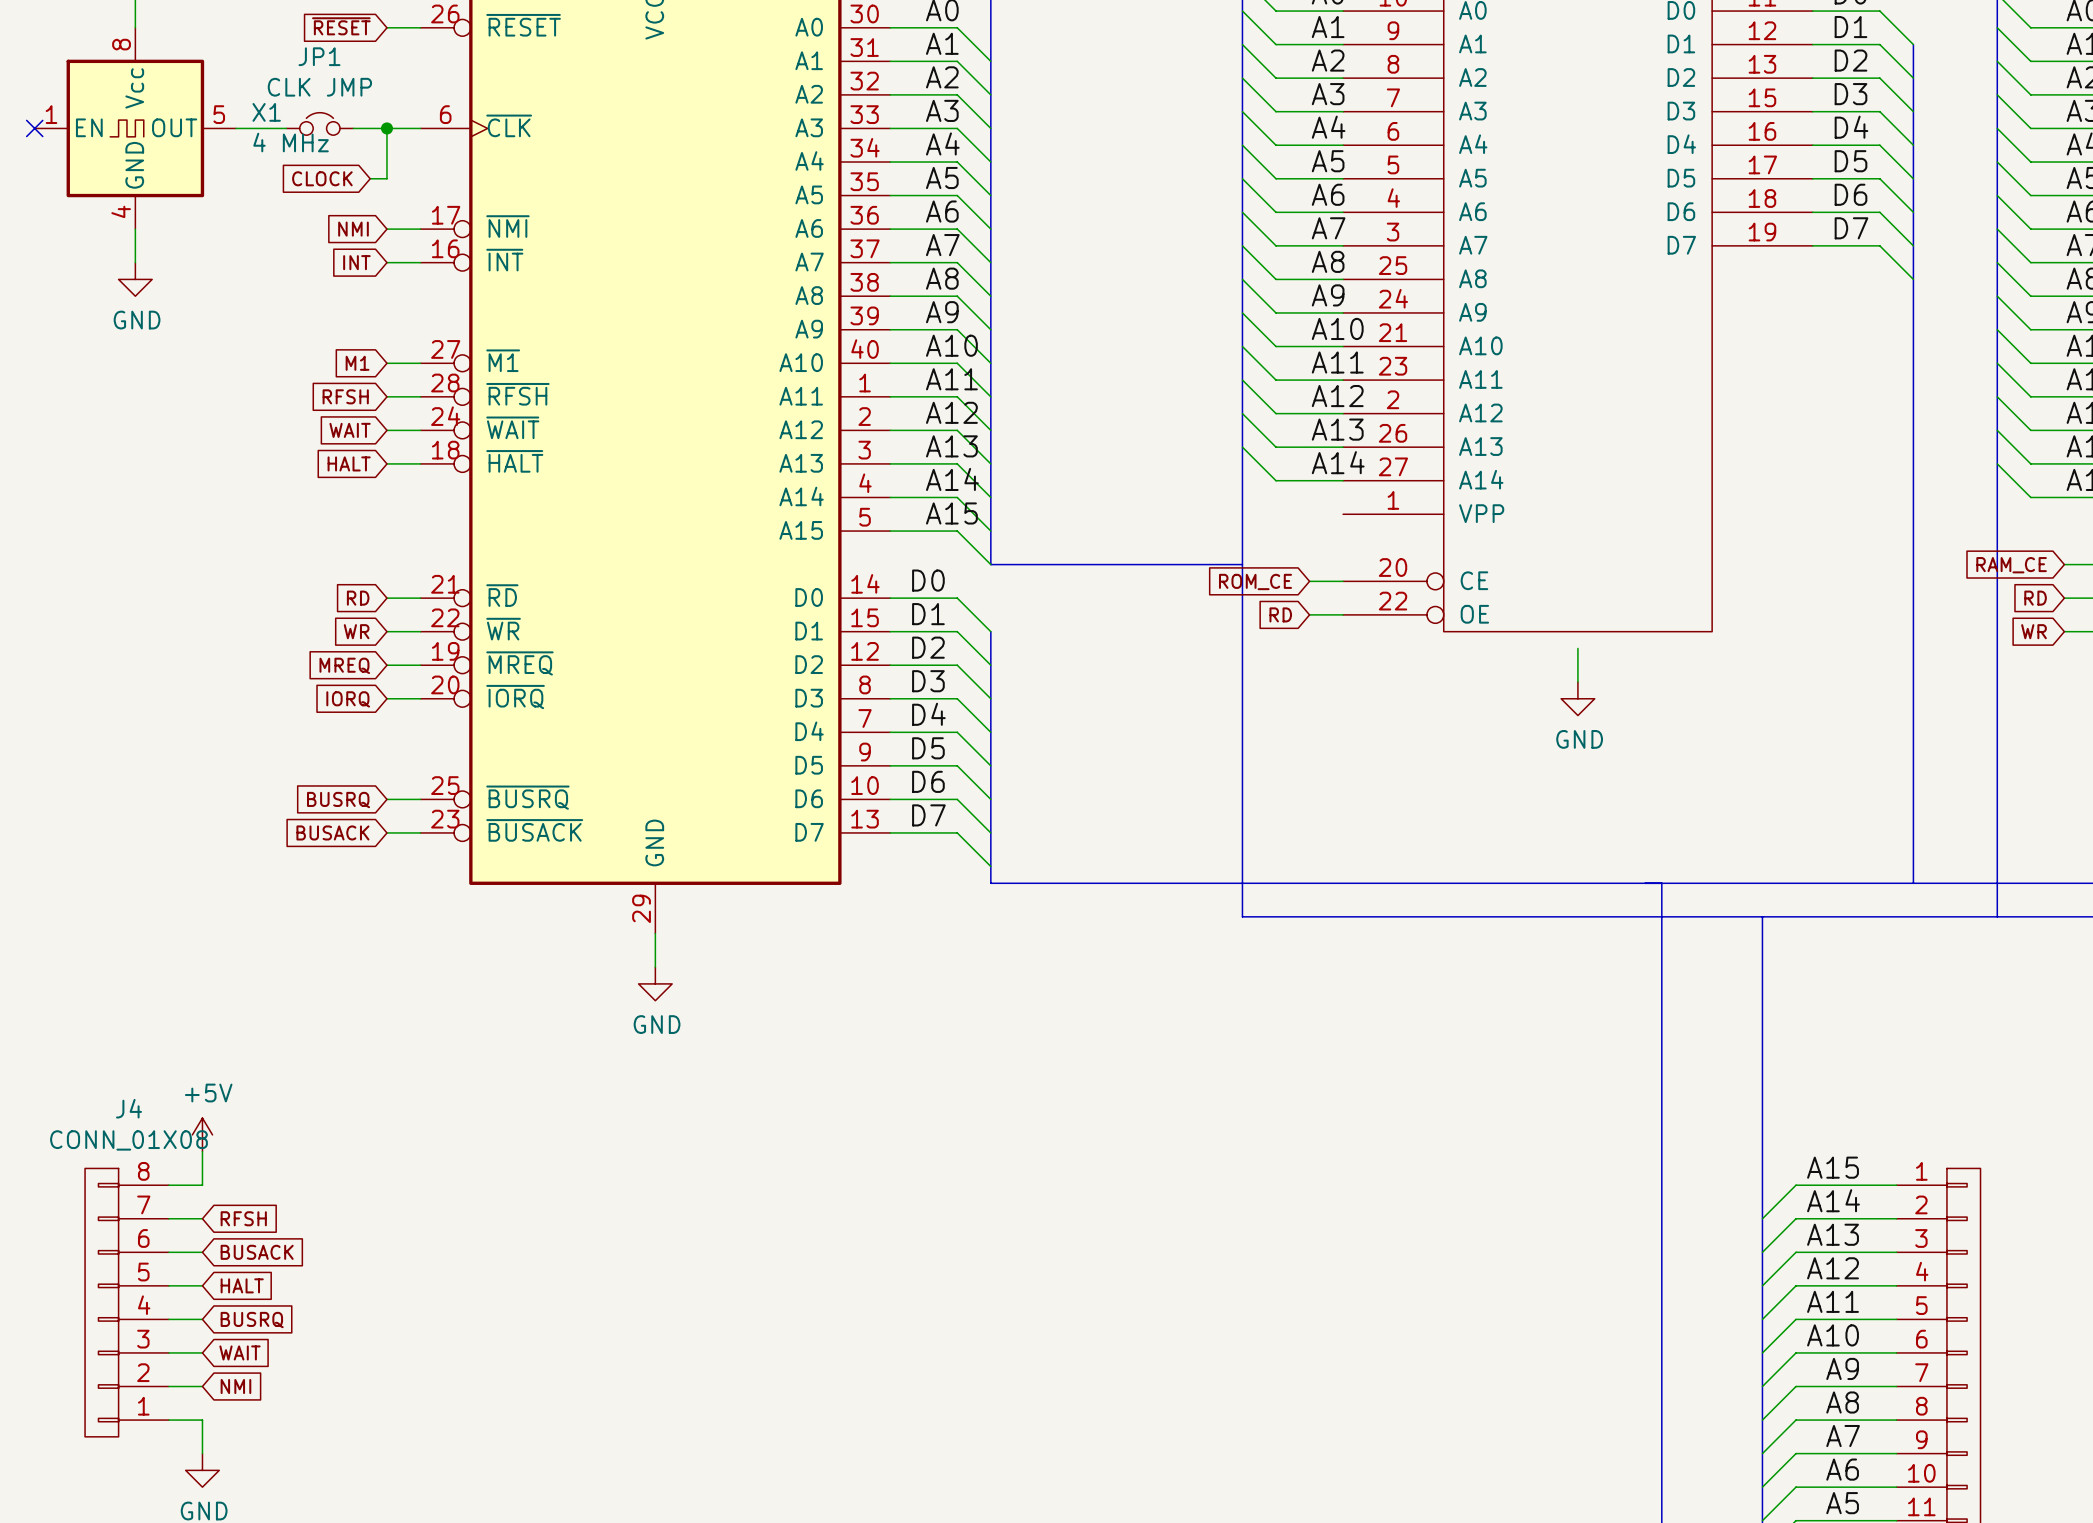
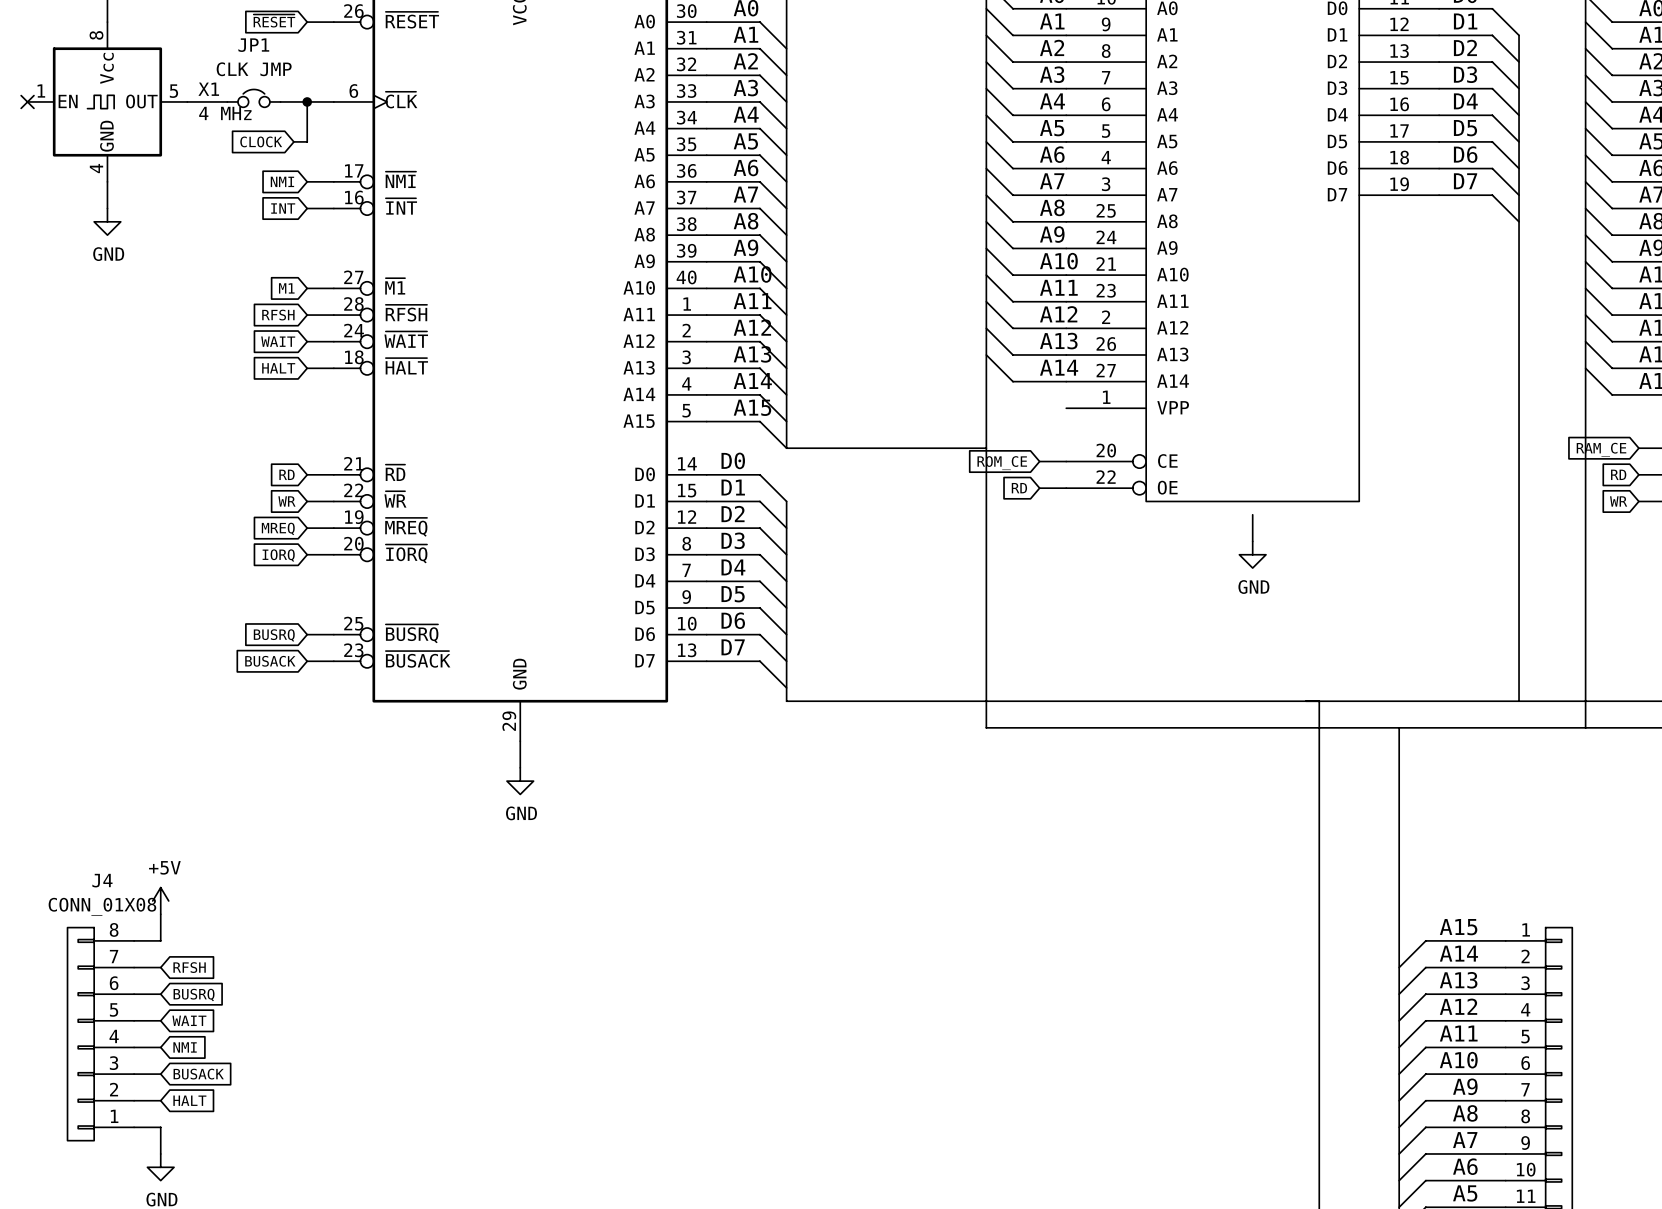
global label: BUSACK (257, 1252) -> BUSRQ (194, 995)
global label: HALT (242, 1285) -> WAIT (189, 1020)
global label: BUSRQ (252, 1320) -> NMI (185, 1047)
global label: WAIT (240, 1352) -> BUSACK (198, 1074)
global label: NMI (235, 1386) -> HALT (189, 1100)

